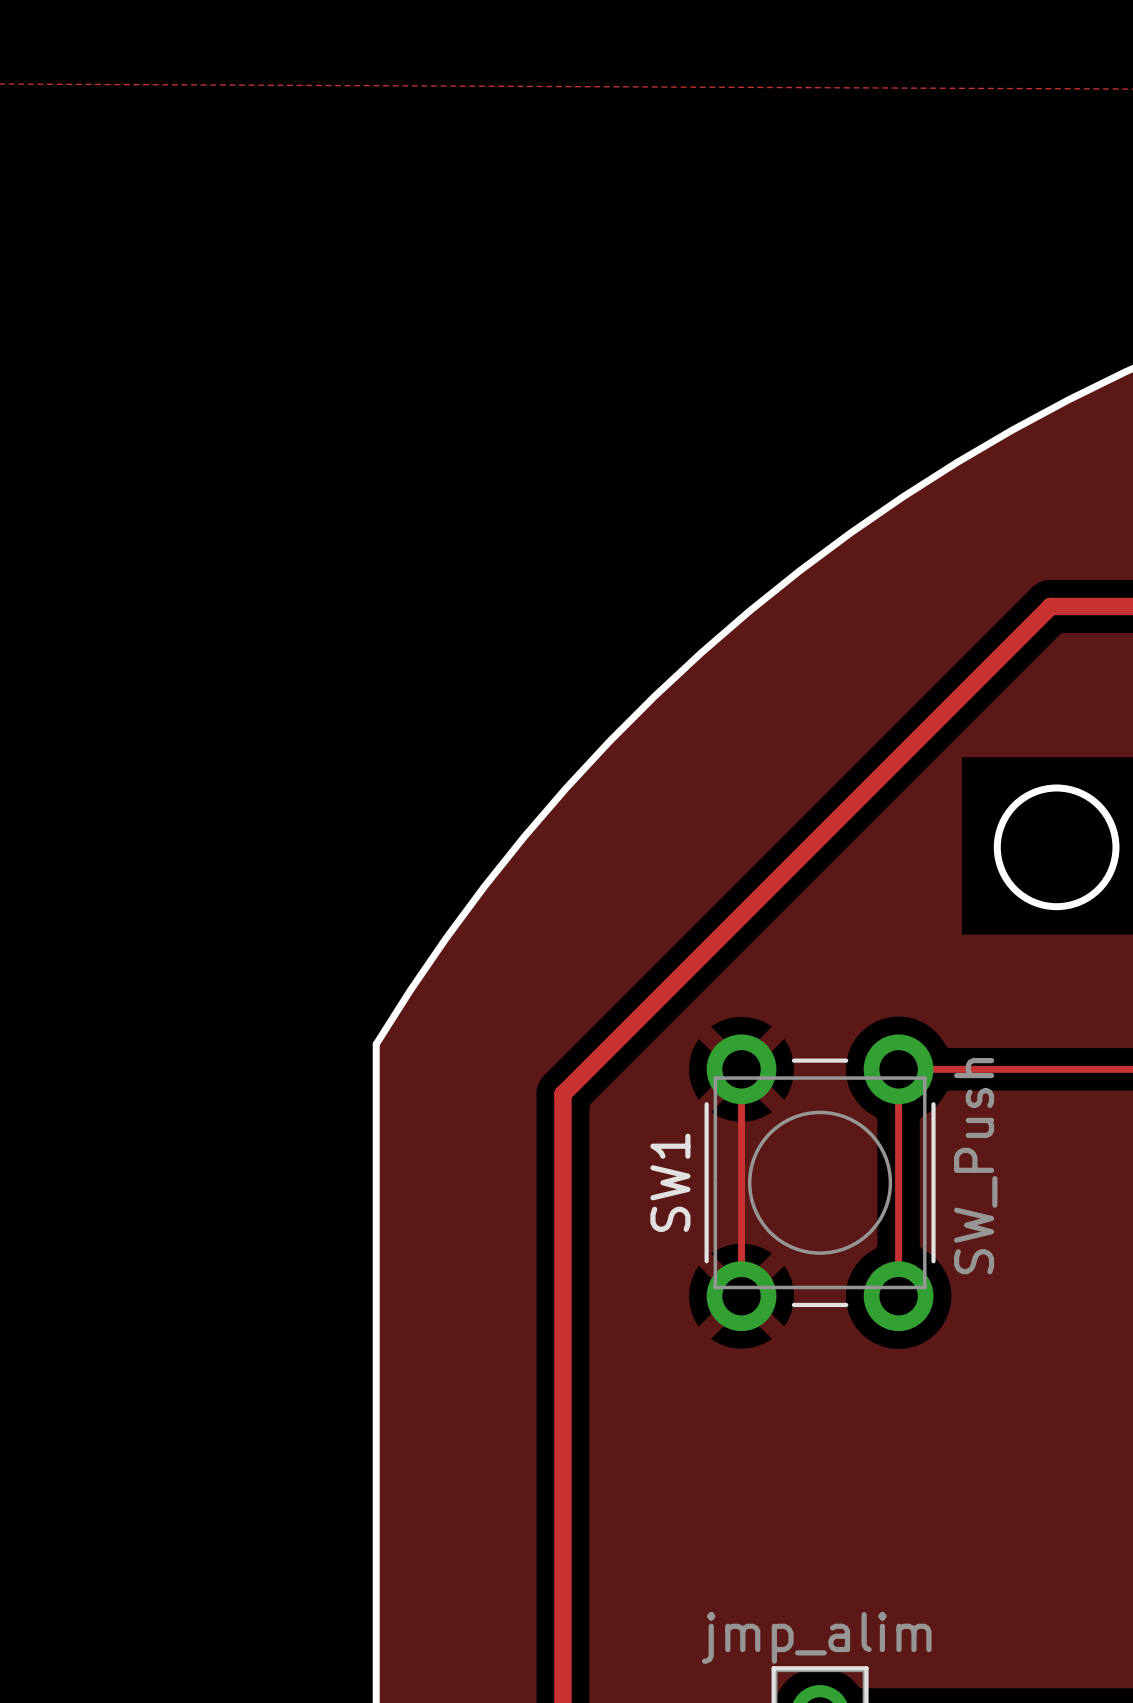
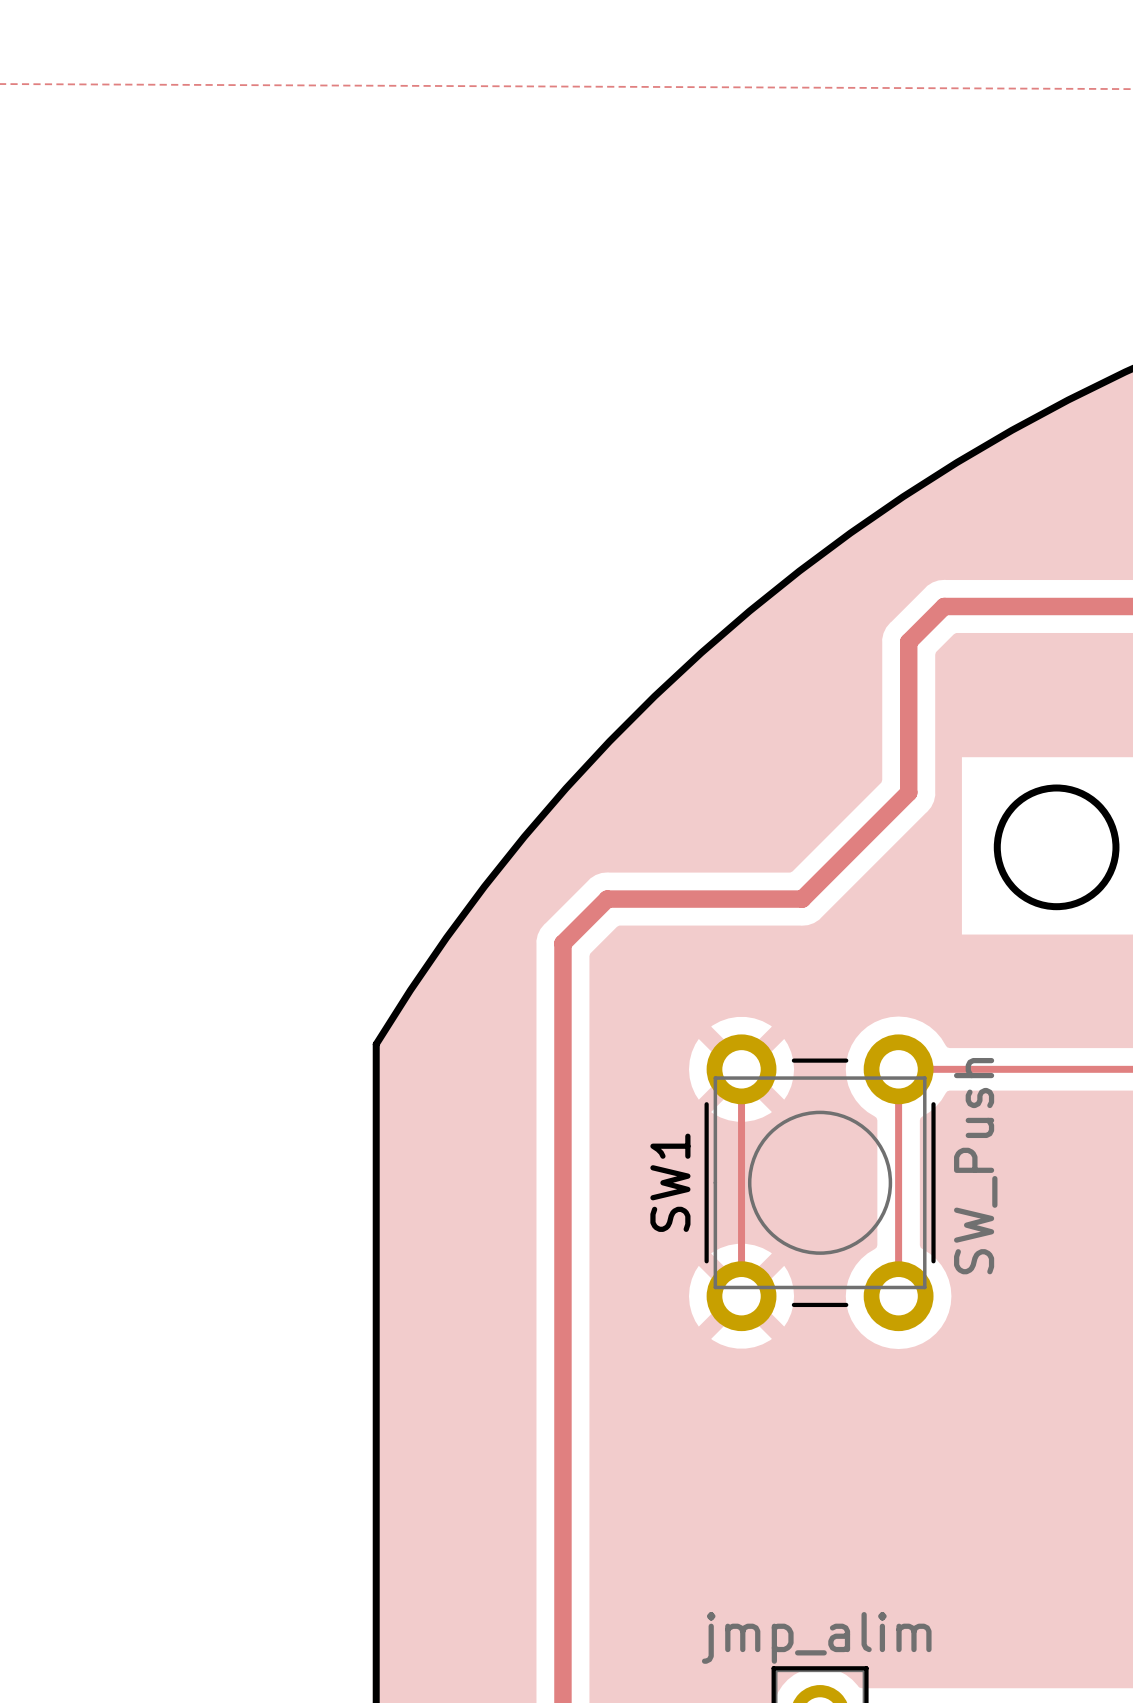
track: (1050, 606) (562, 1094) -> (1050, 606) (944, 606) (908, 641) (908, 792) (802, 899) (607, 899) (562, 943) (562, 1094)

